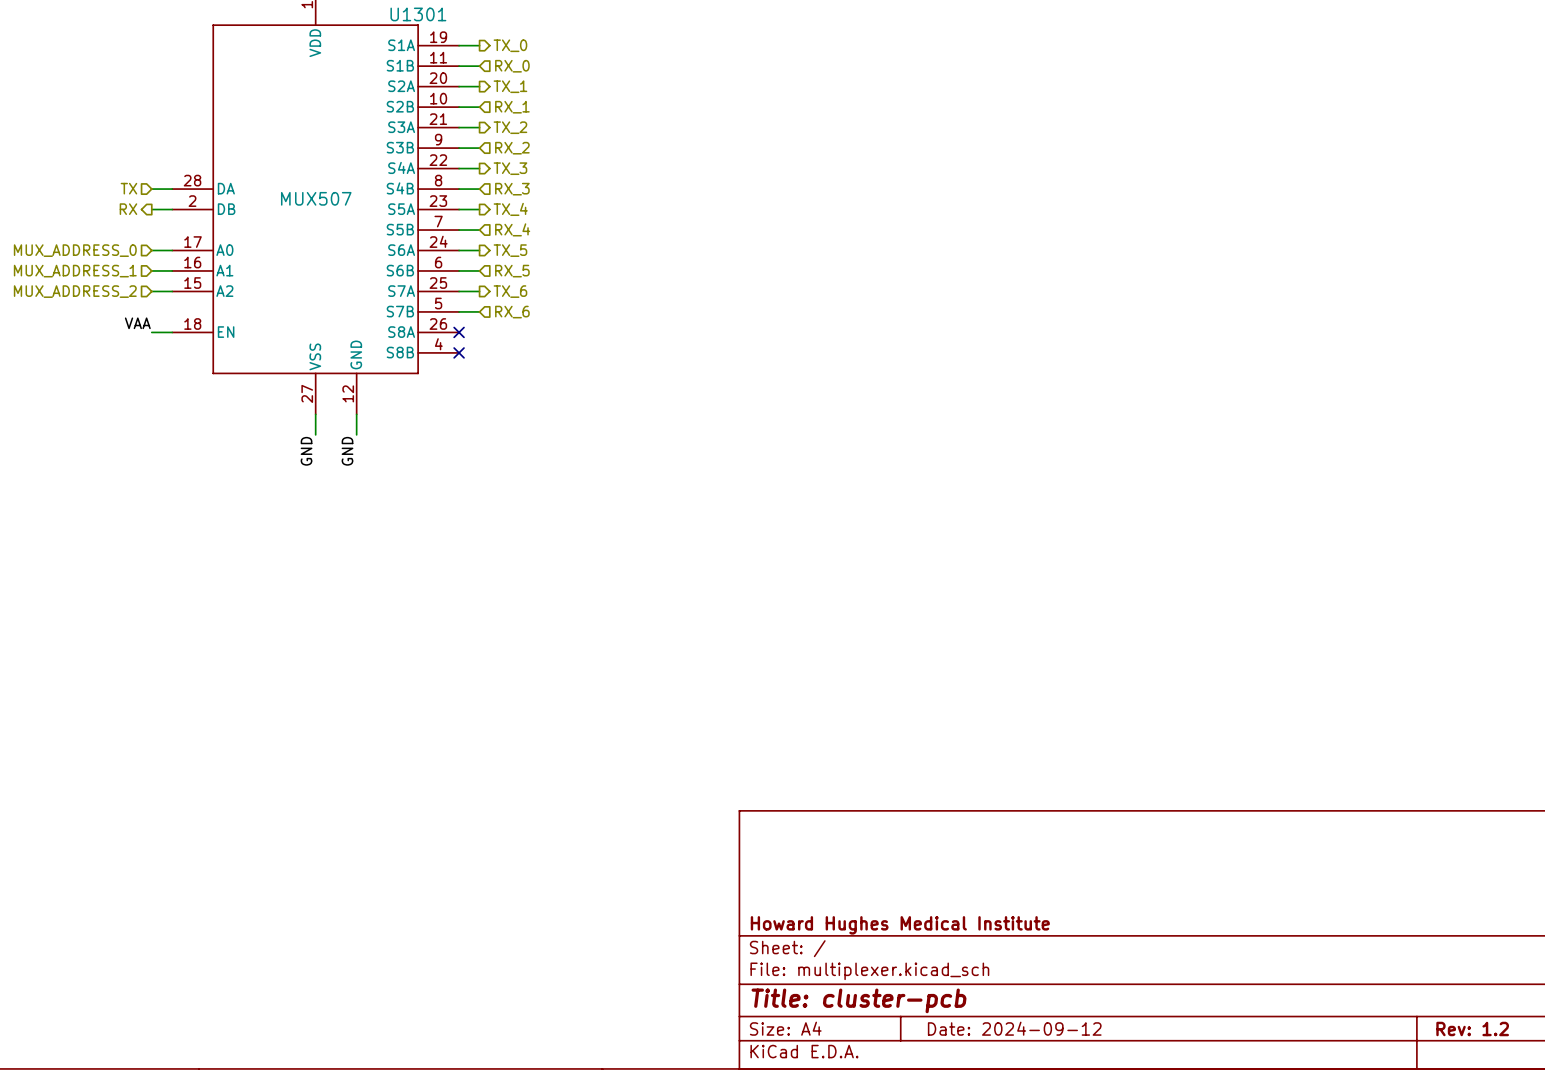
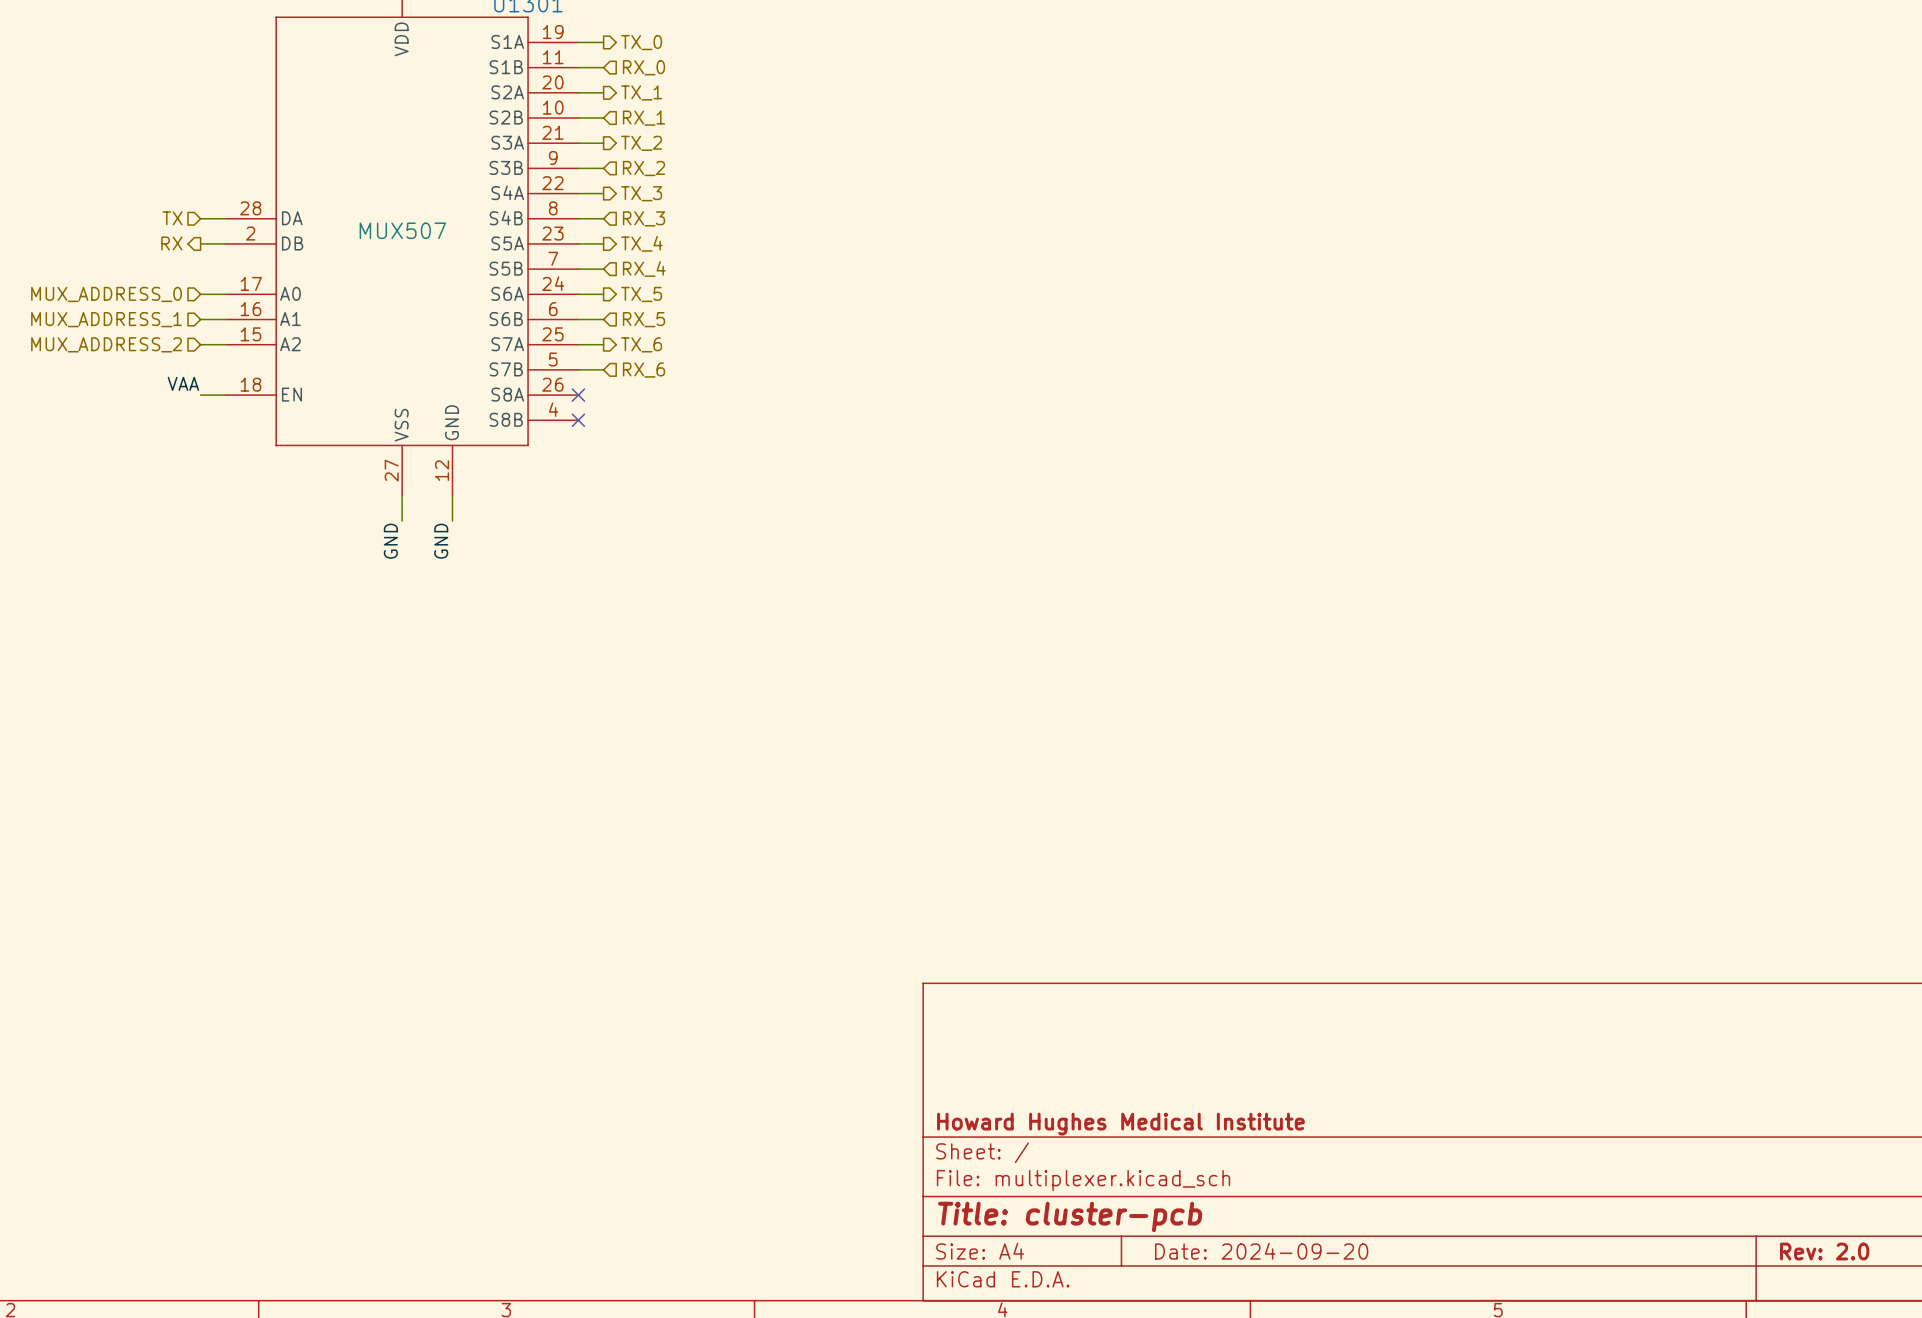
title block: Date: 2024-09-12 (1014, 1028) -> Date: 2024-09-20 (1261, 1251)
title block: Rev: 1.2 (1472, 1028) -> Rev: 2.0 (1824, 1251)

